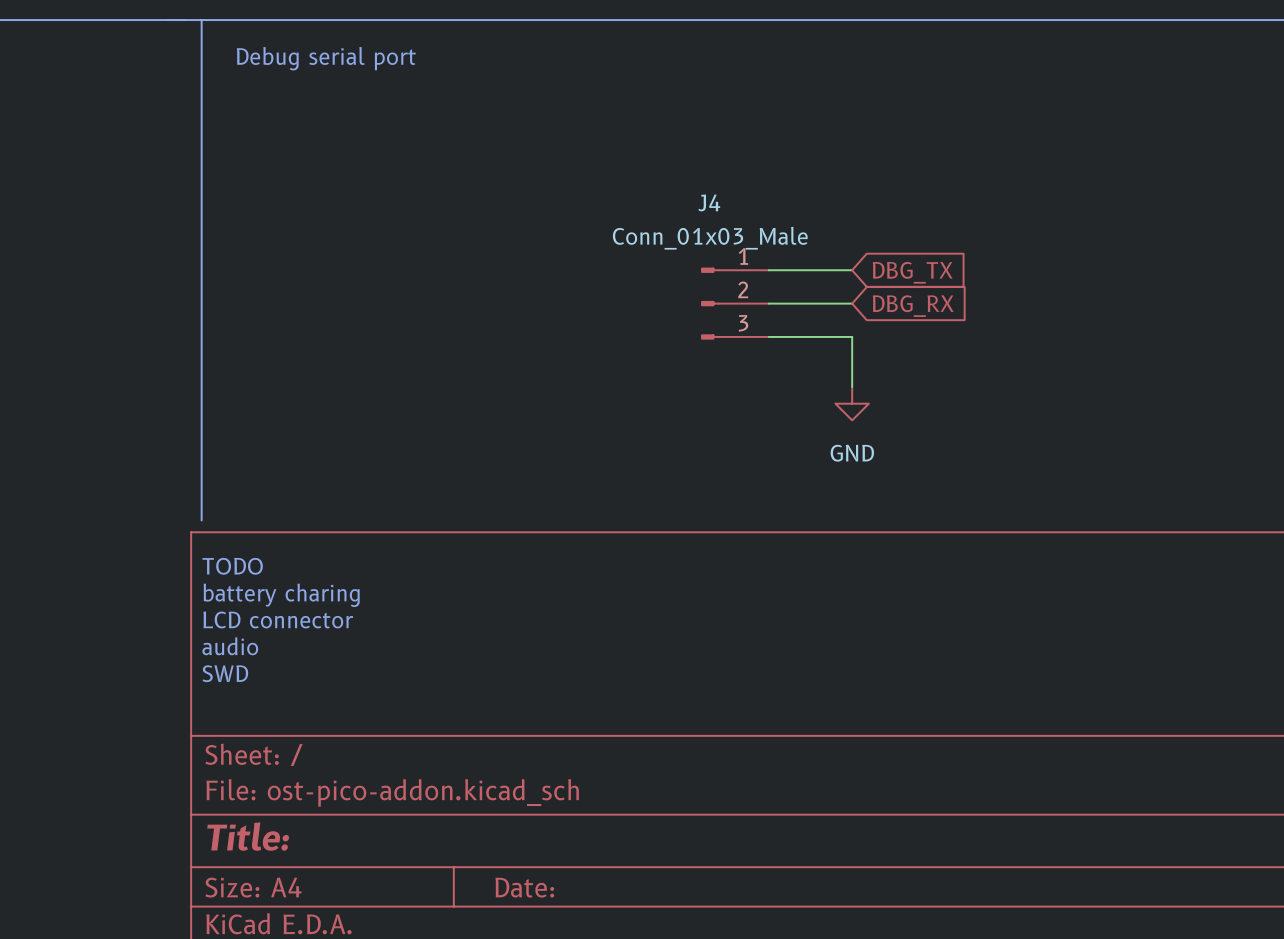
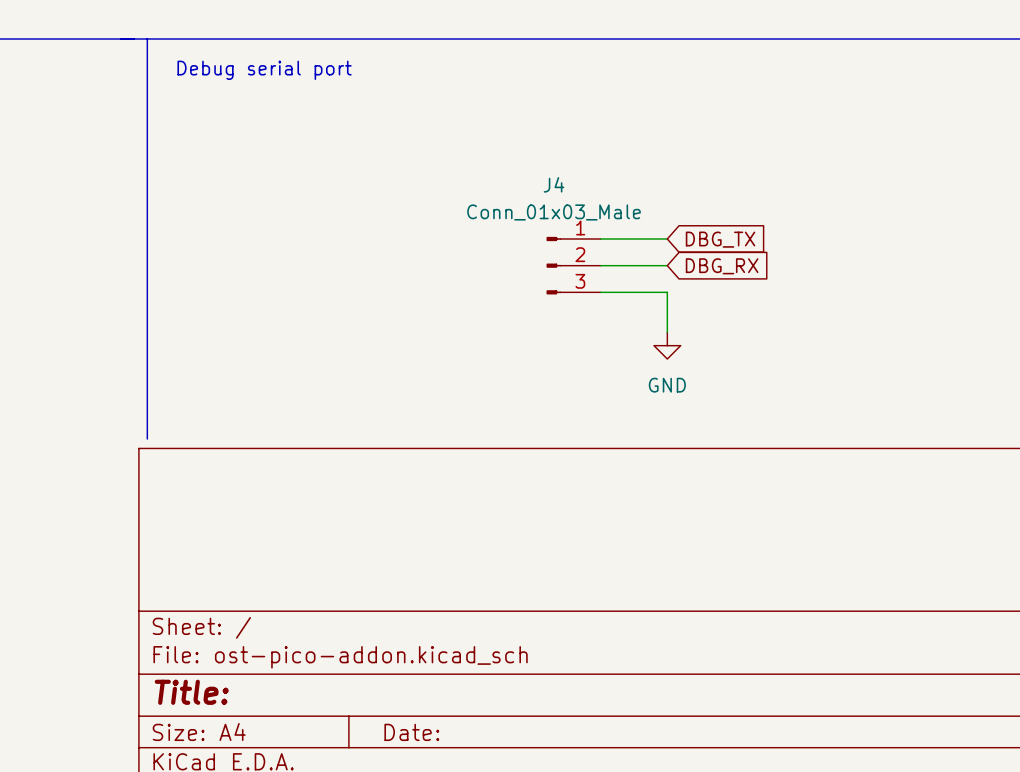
text: TODO (232, 566) -> none
text: battery charing (281, 595) -> none
text: LCD connector (278, 619) -> none
text: audio (230, 646) -> none
text: SWD (225, 673) -> none

